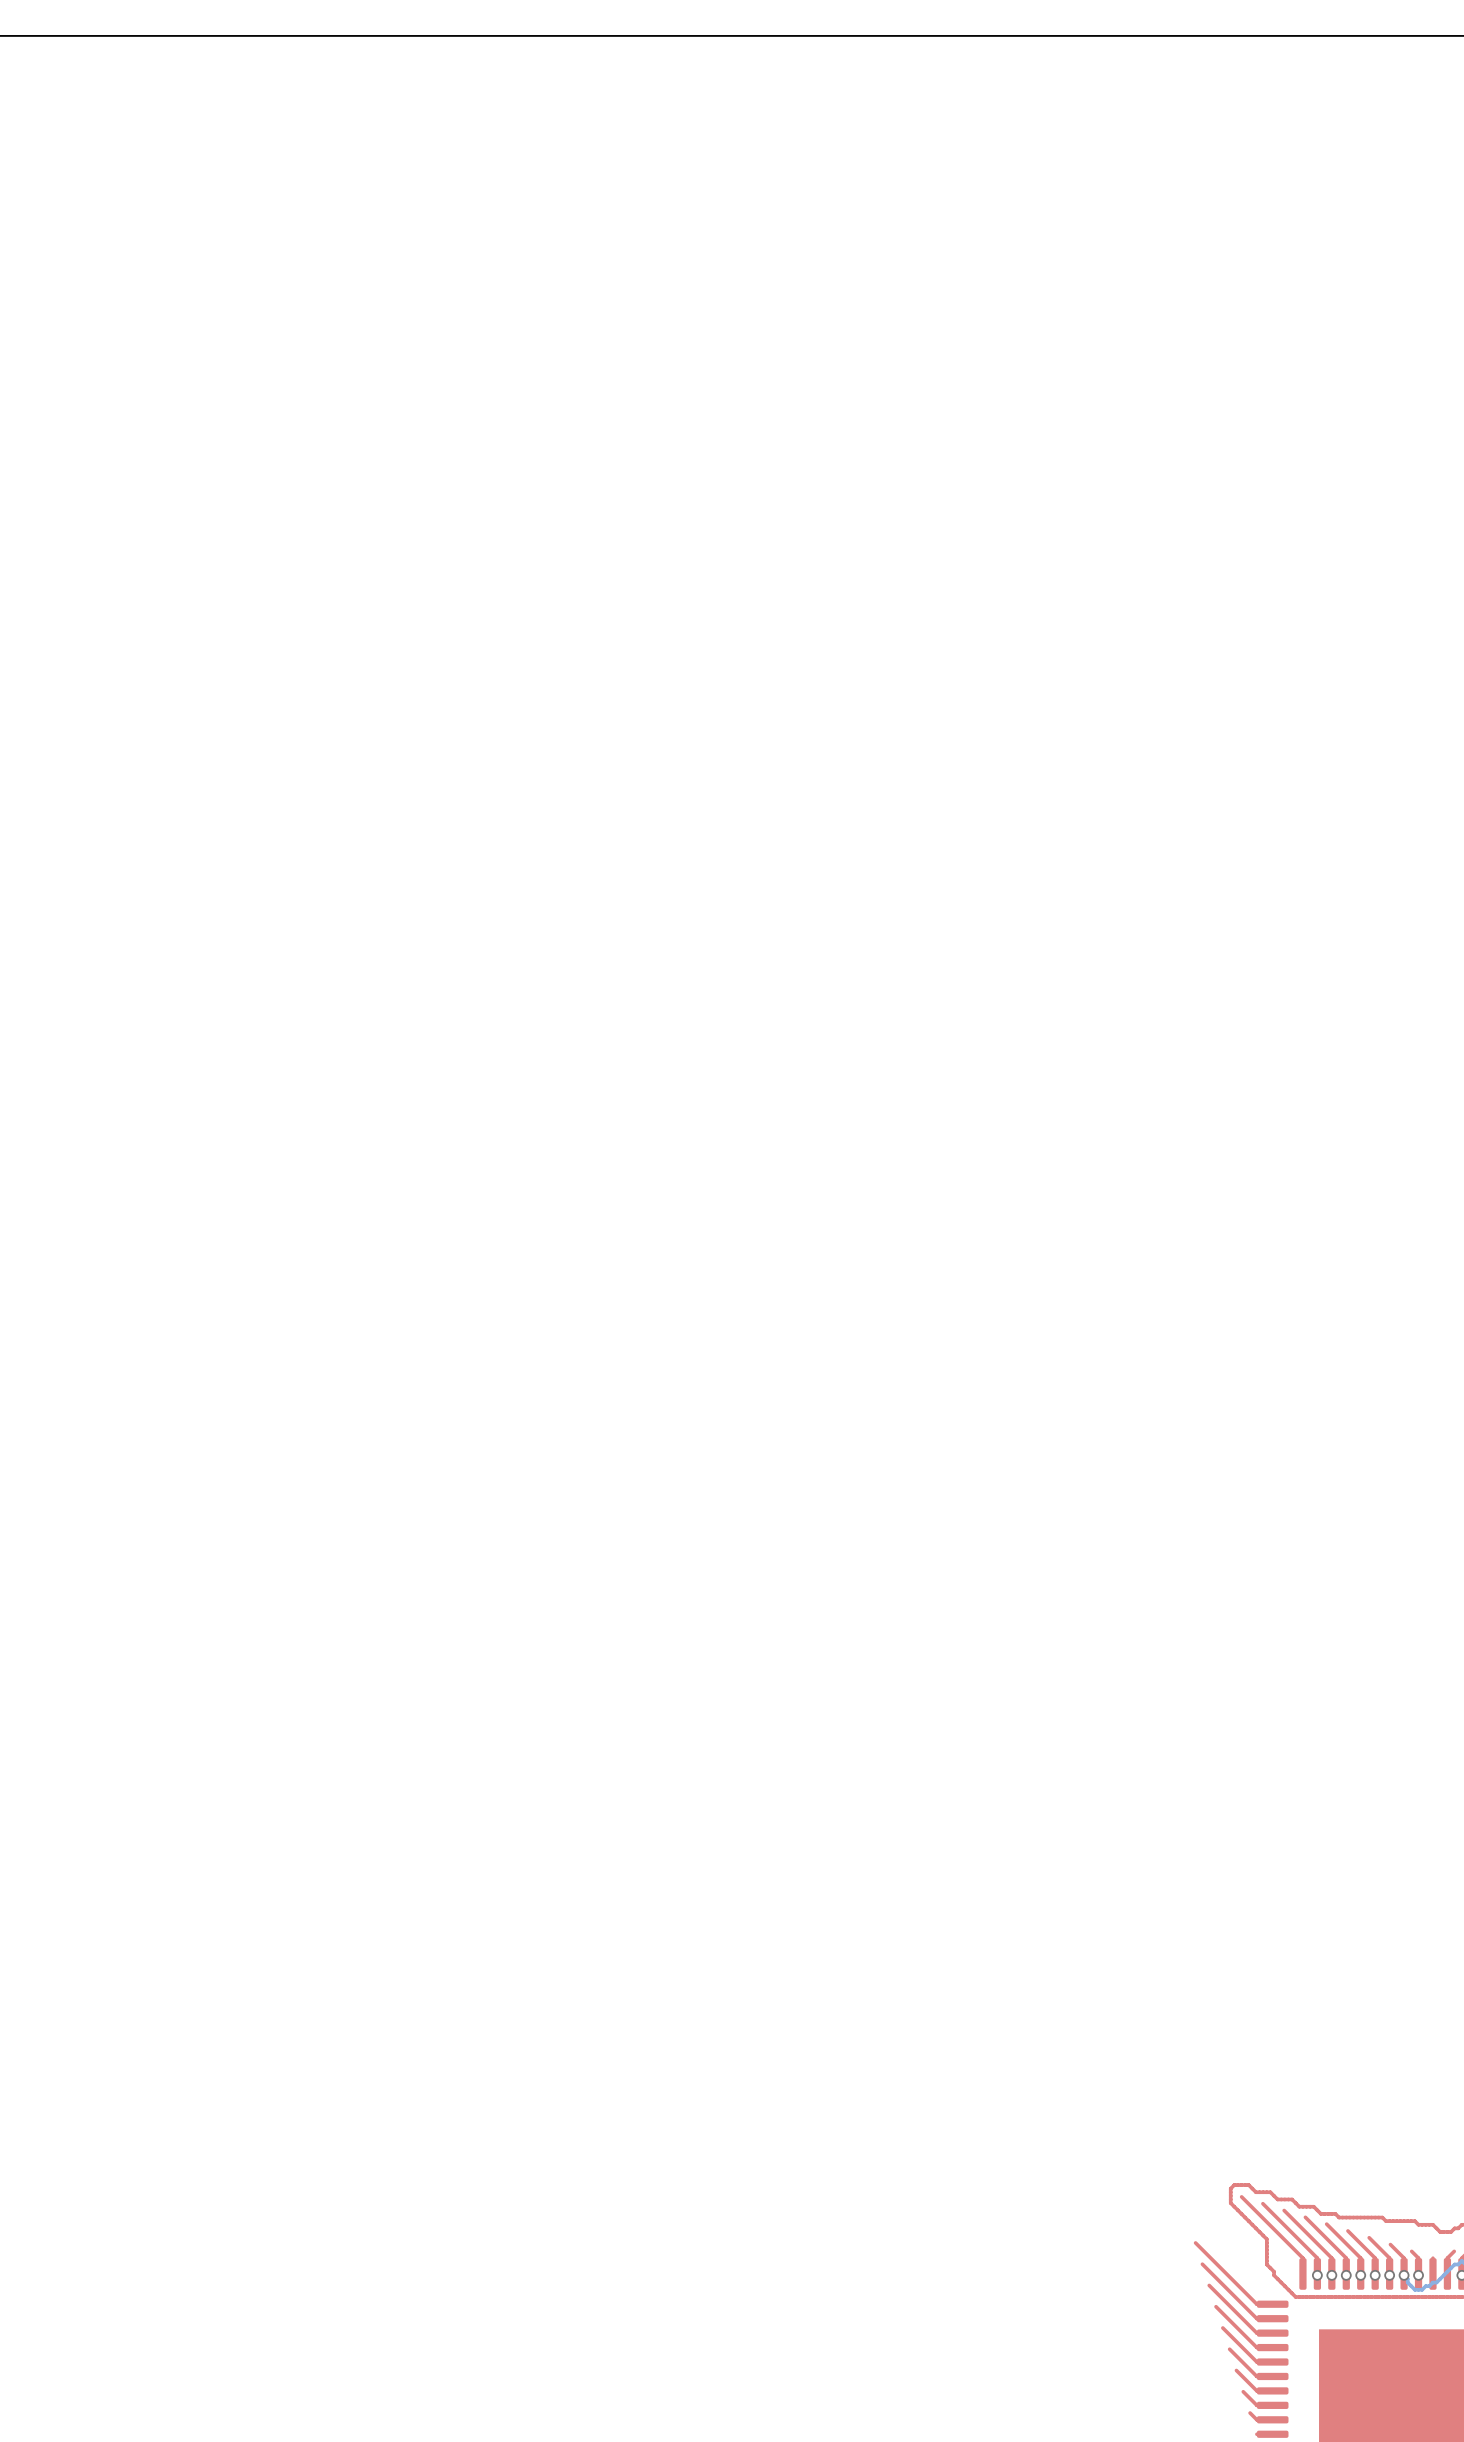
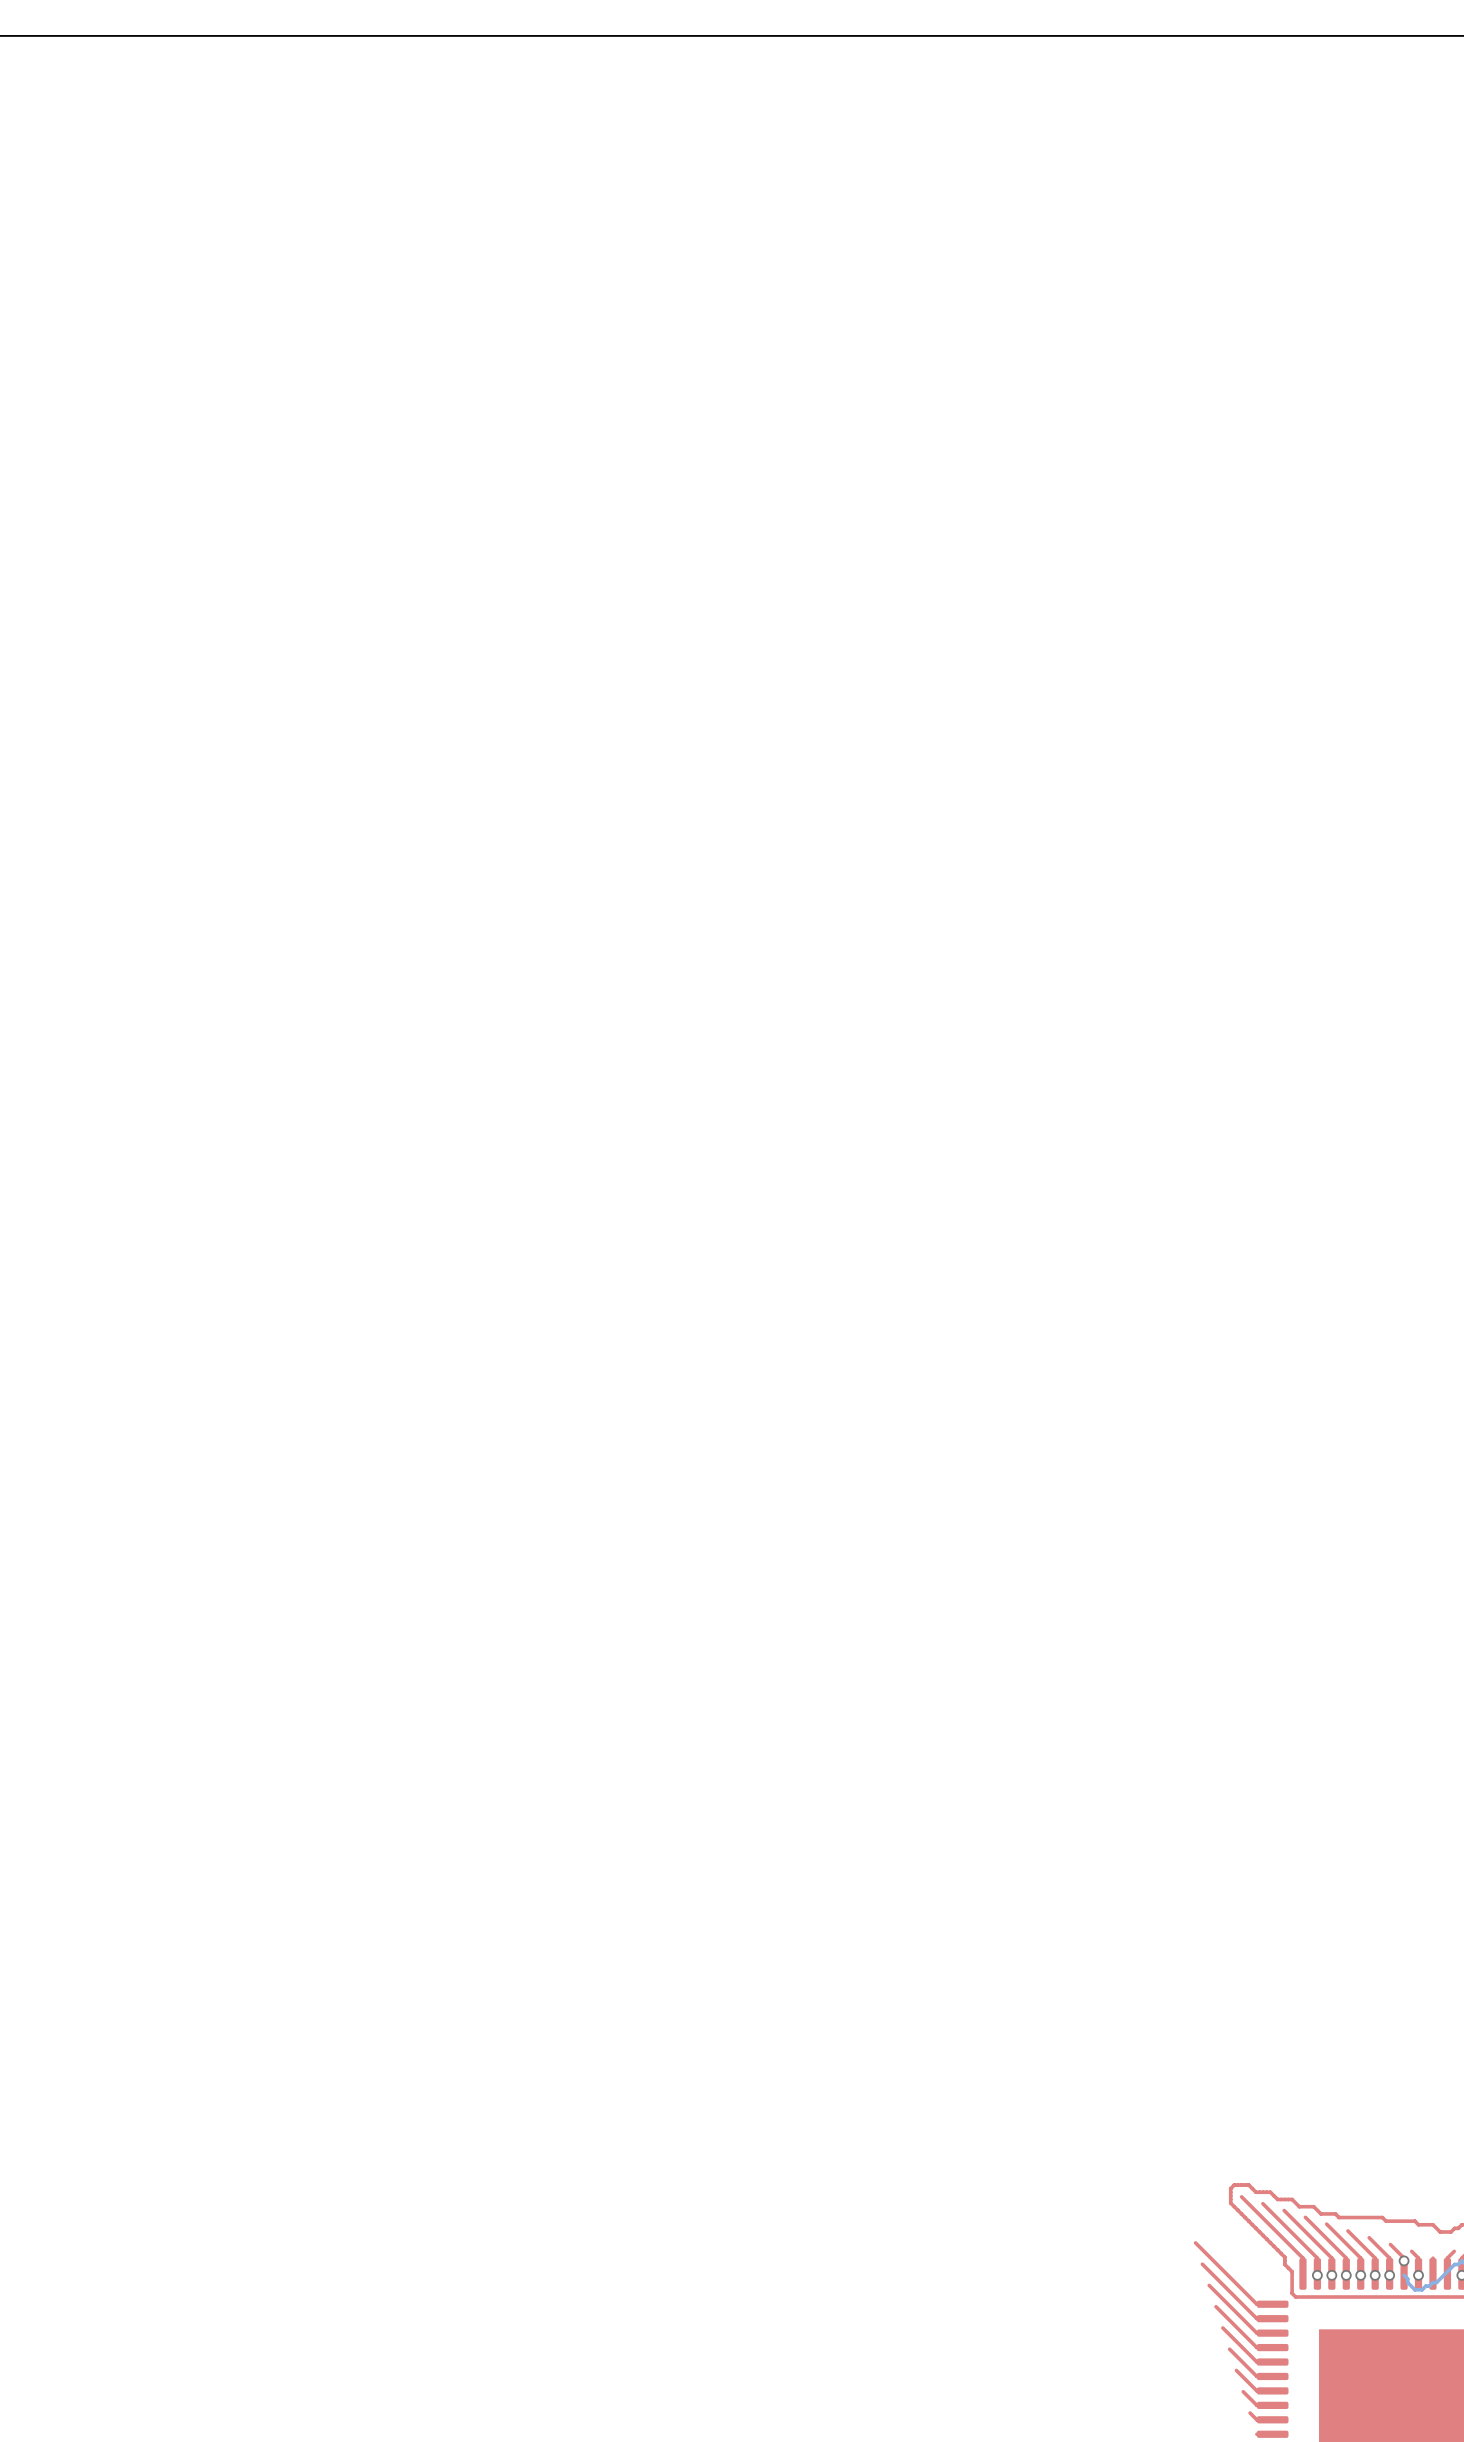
top track: (1266, 2239) (1266, 2264) (1274, 2271) (1274, 2275) (1292, 2293) -> (1266, 2239) (1284, 2257) (1284, 2264) (1292, 2271) (1292, 2293)
via position: (1404, 2275) -> (1404, 2260)

